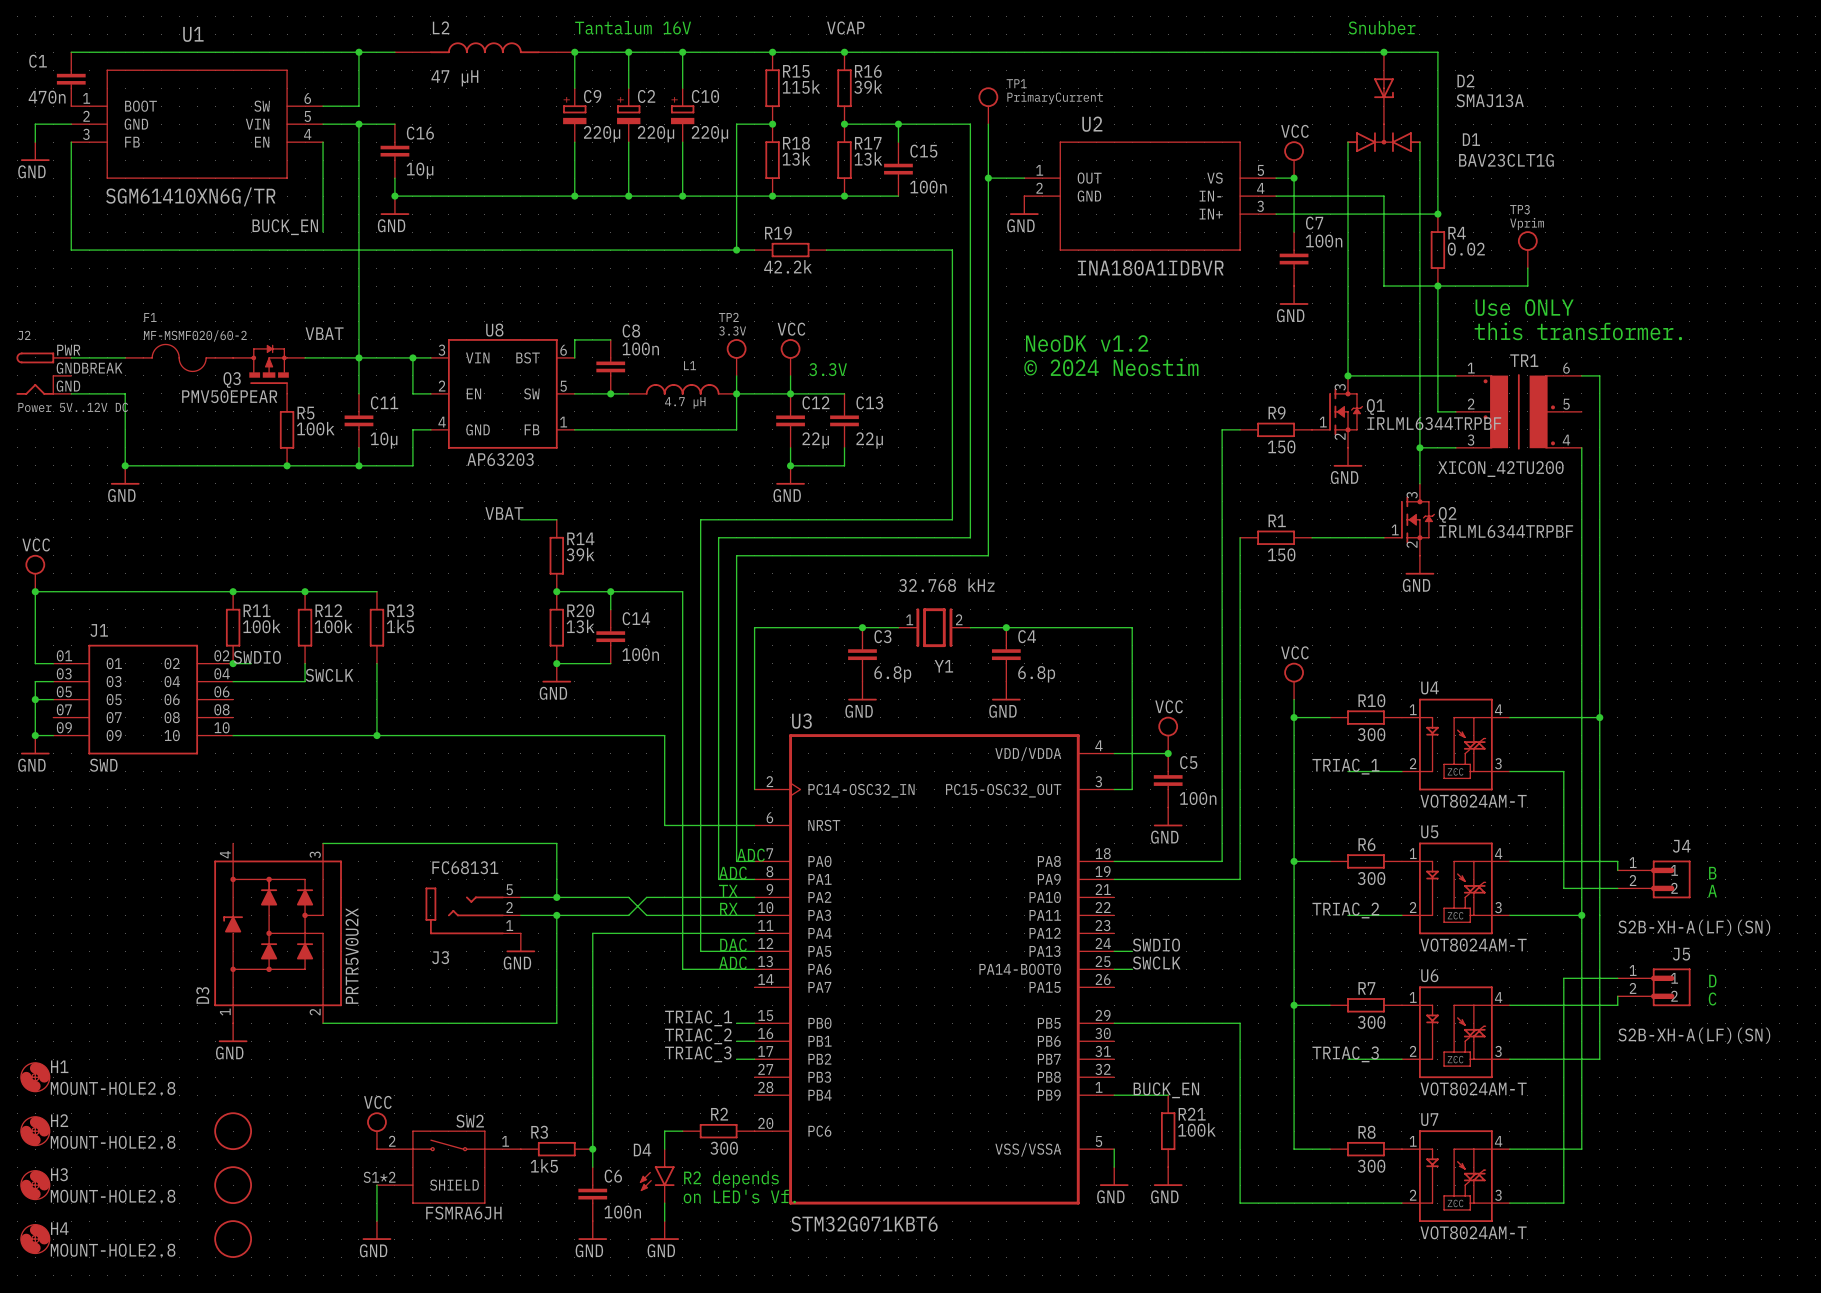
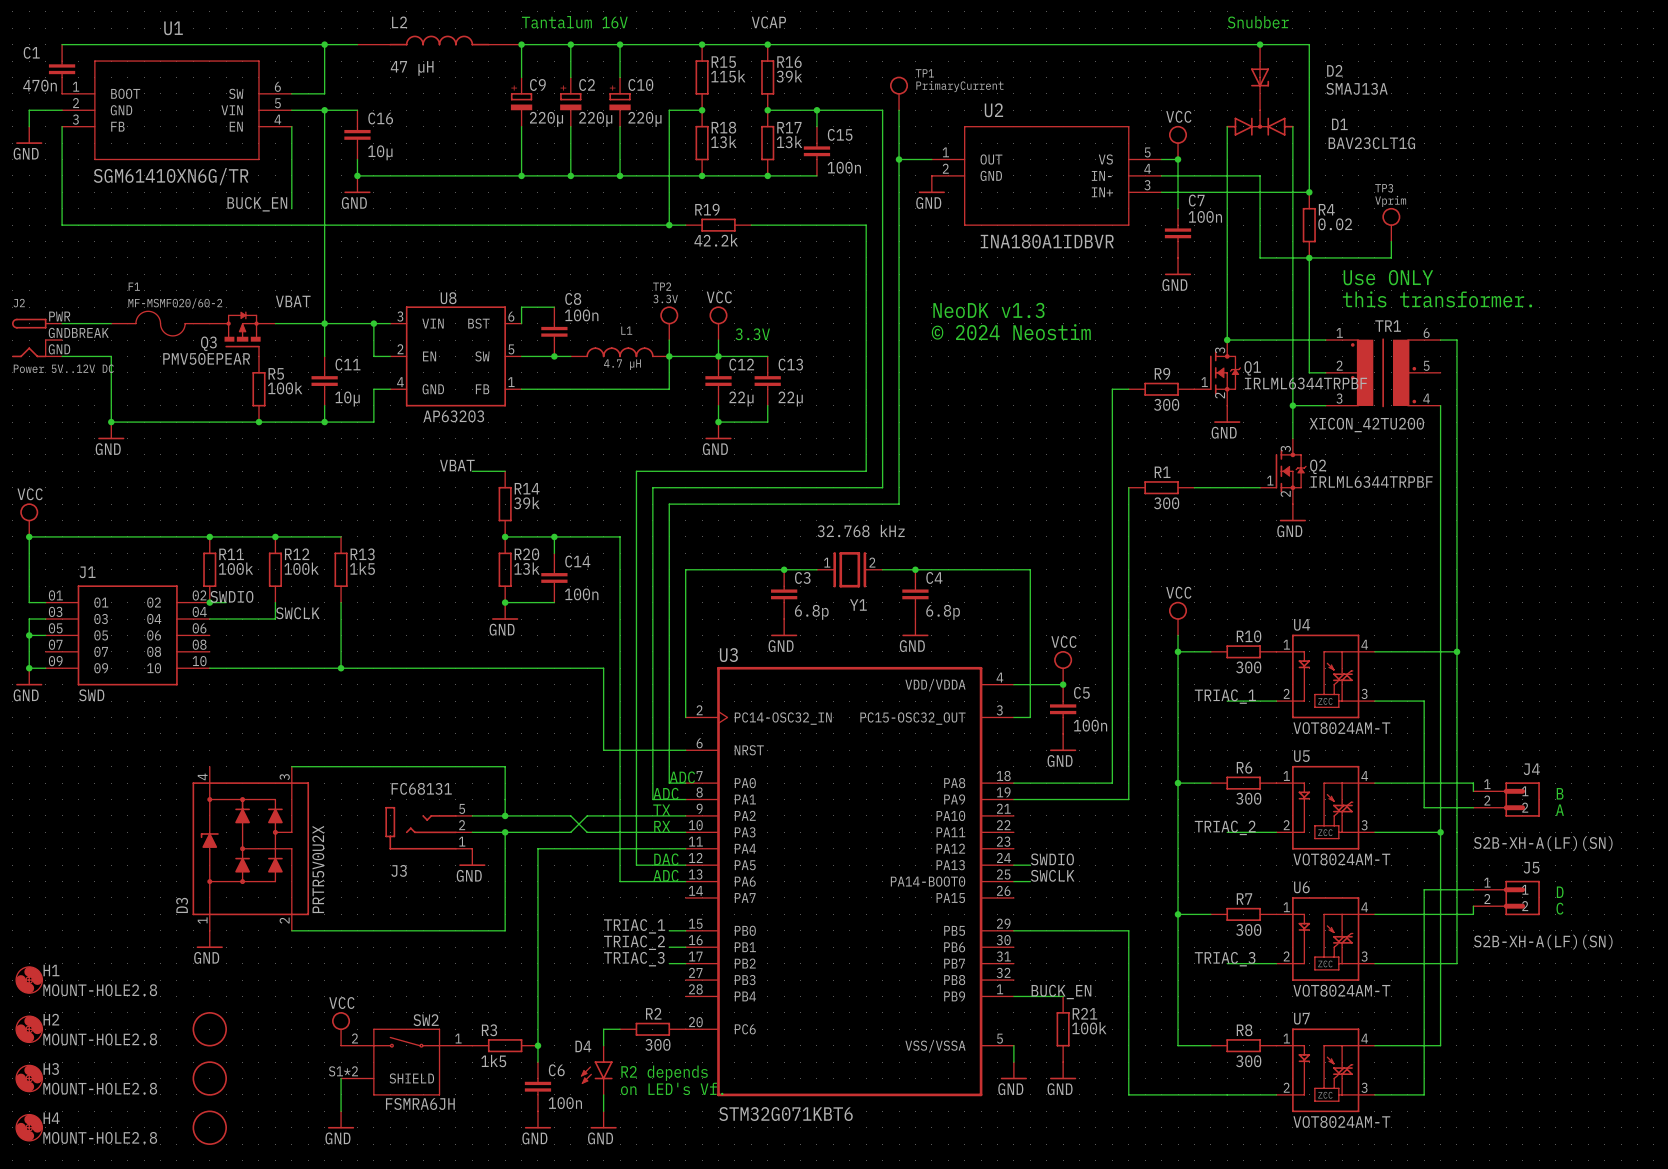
text: NeoDK v1.2 (1087, 343) -> NeoDK v1.3 (988, 310)
R9 value: 150 (1281, 446) -> 300 (1166, 404)
R1 value: 150 (1281, 554) -> 300 (1166, 503)

